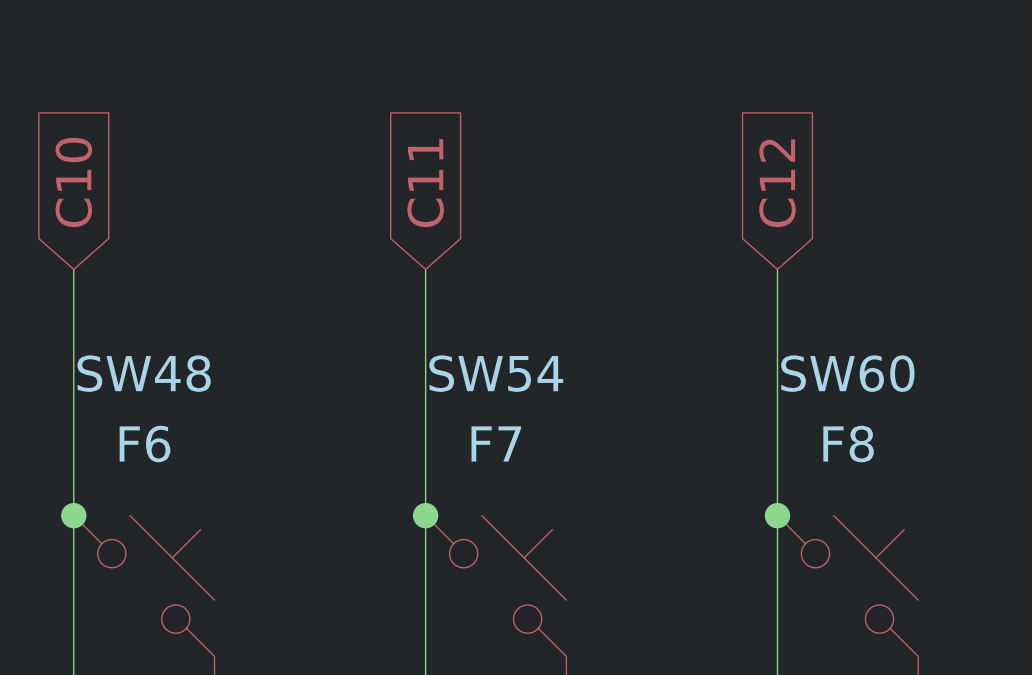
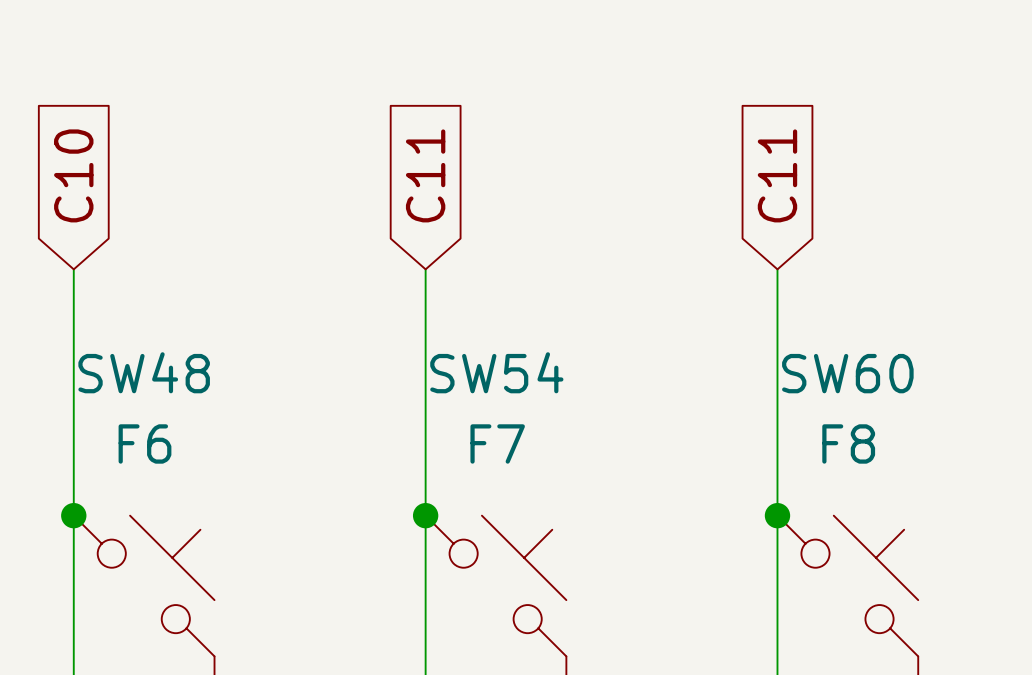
global label: C12 (777, 183) -> C11 (777, 175)

